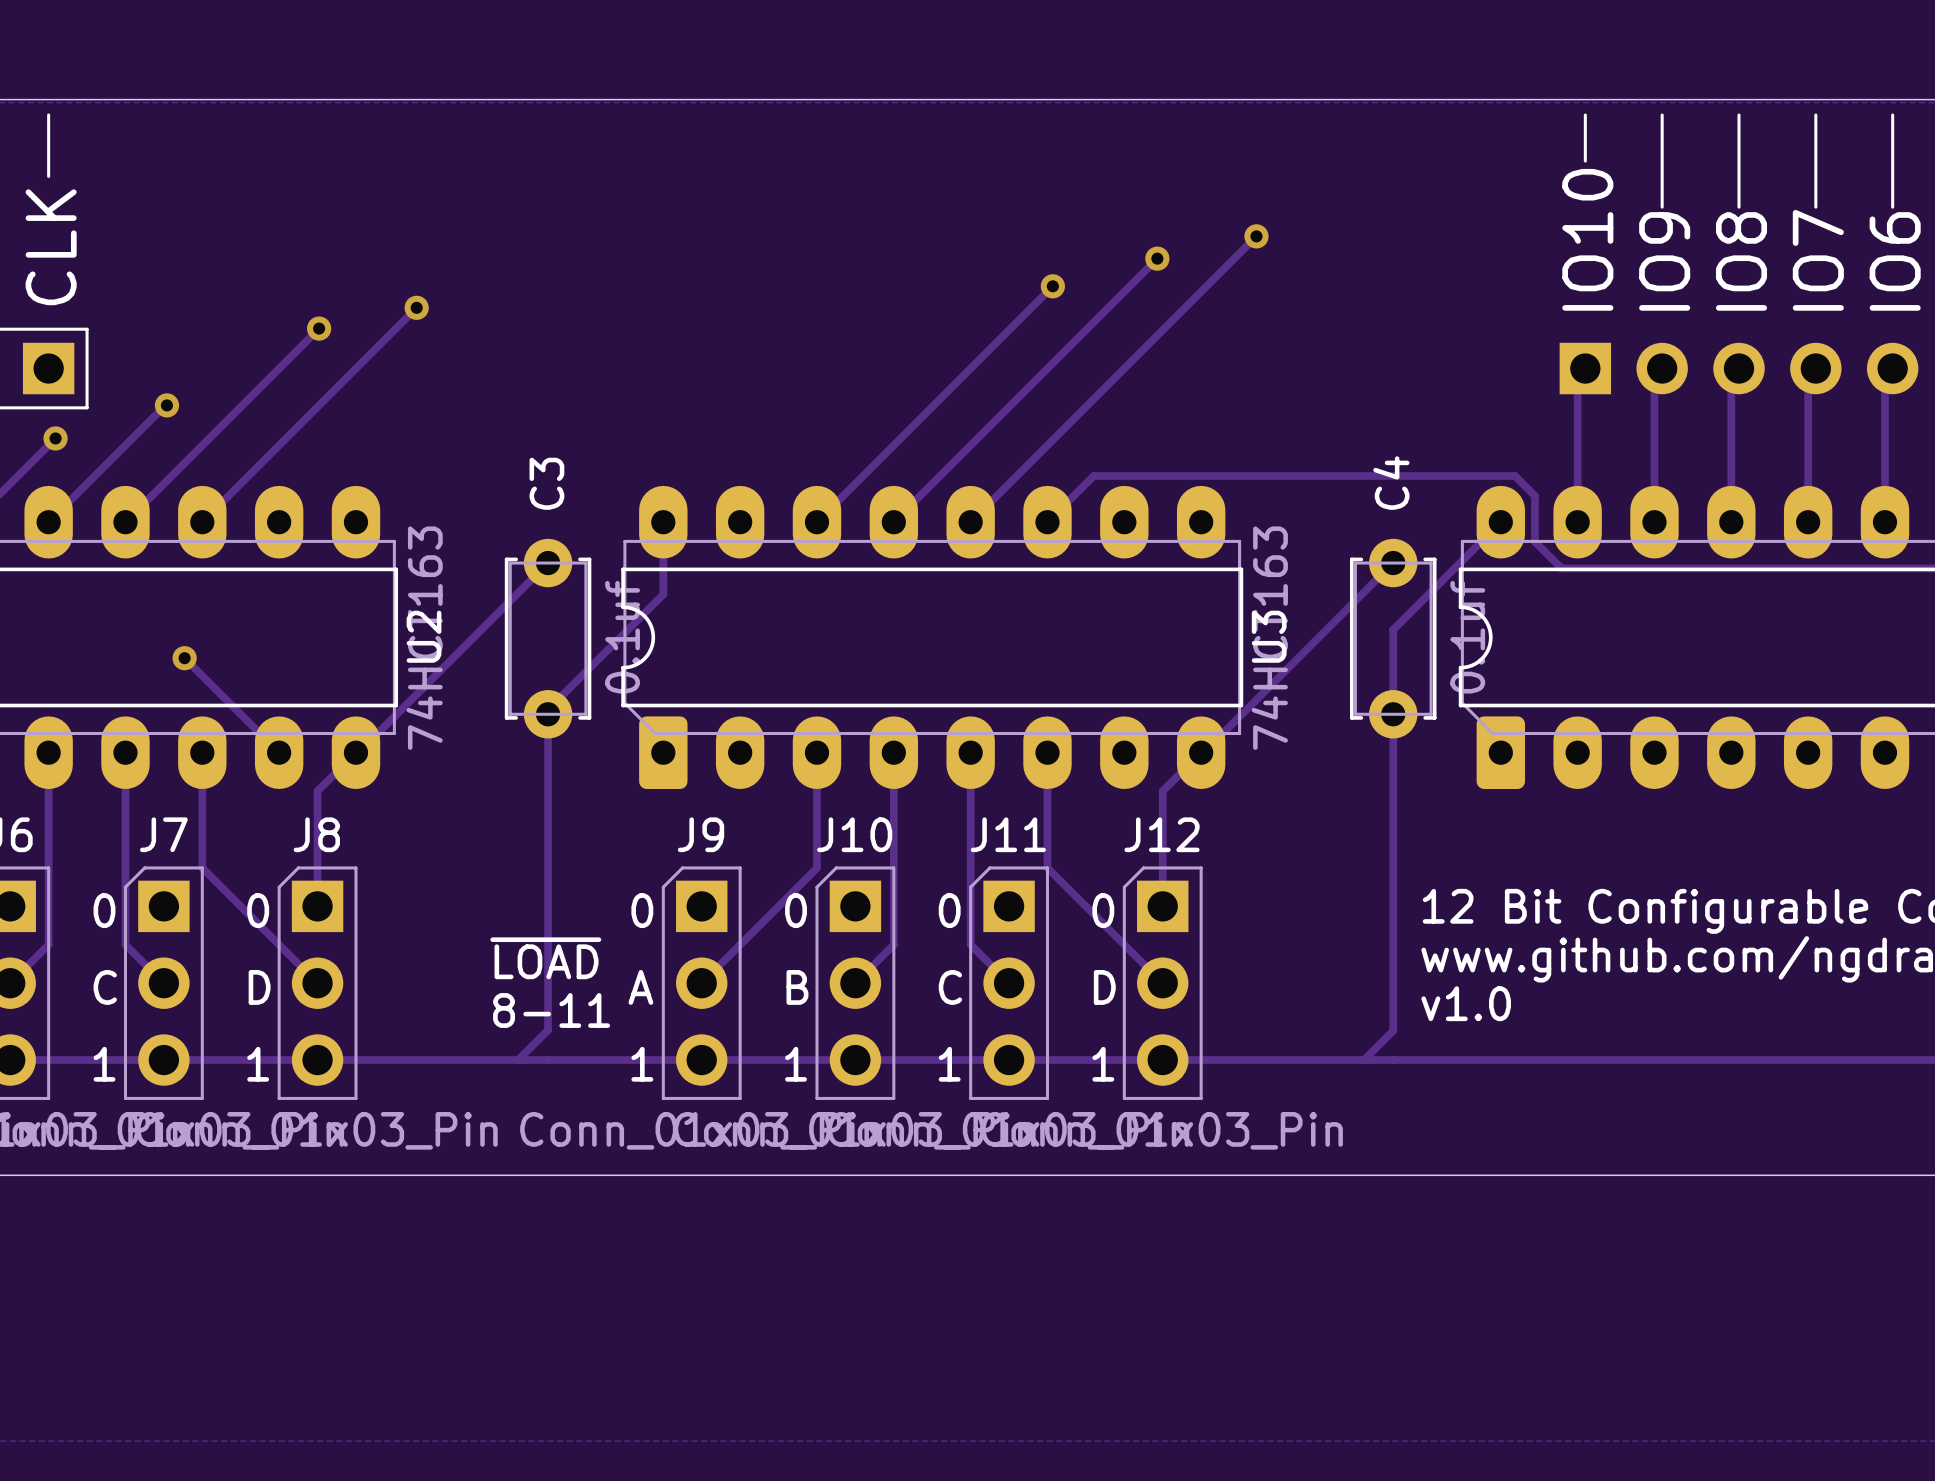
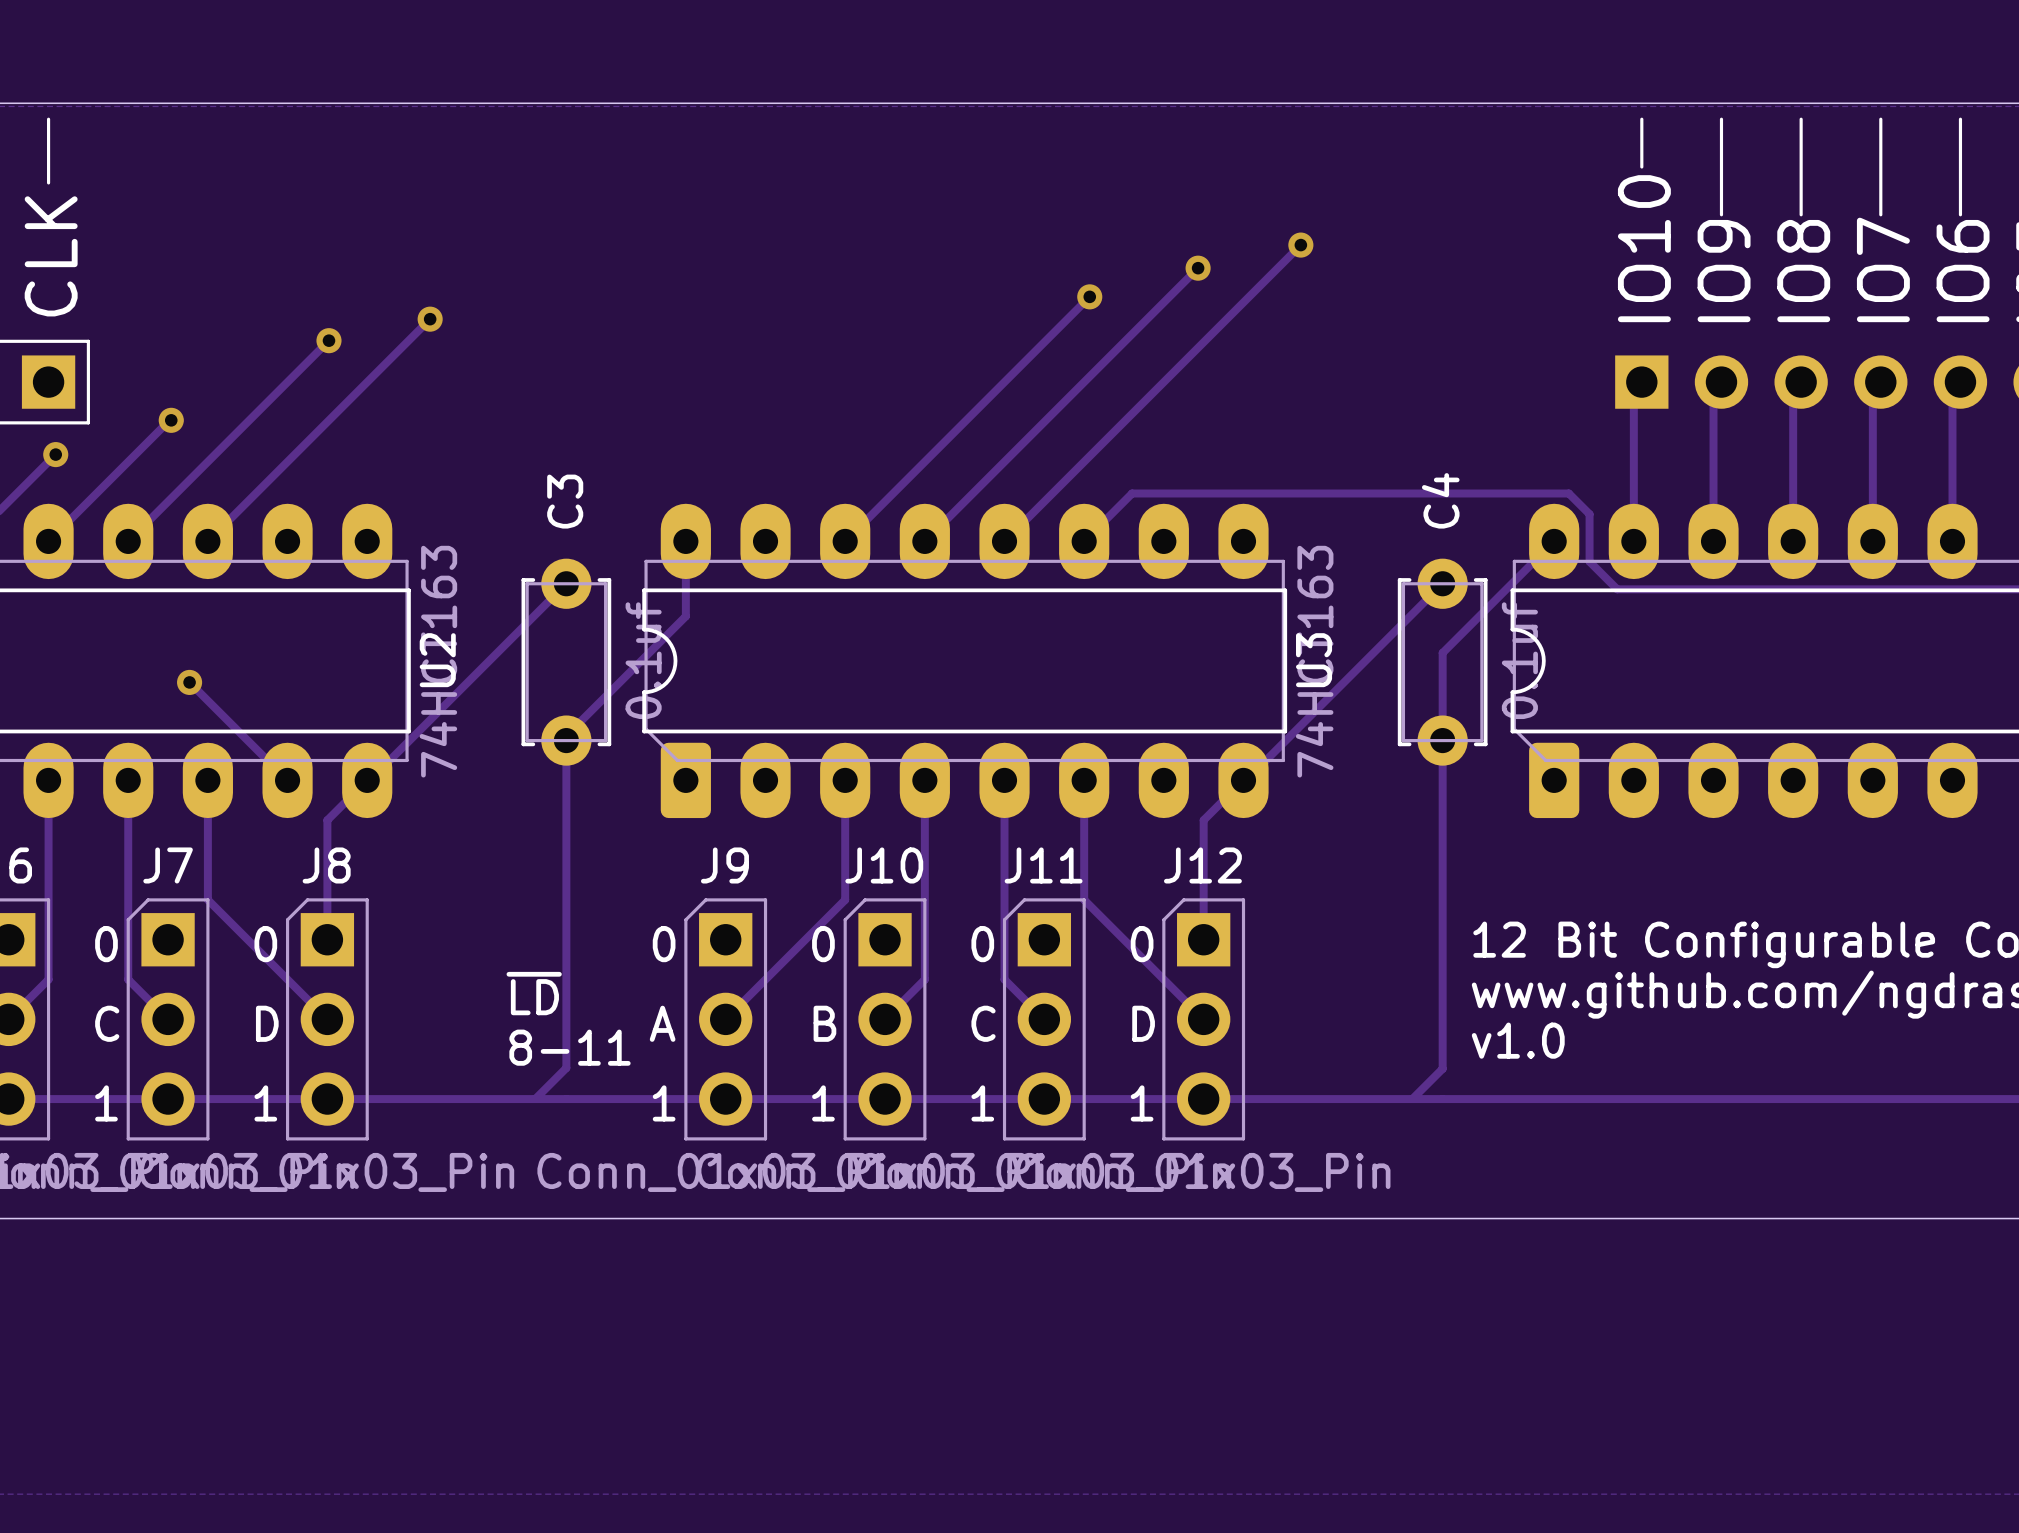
text: ~{LOAD} (545, 958) -> ~{LD} (534, 993)

